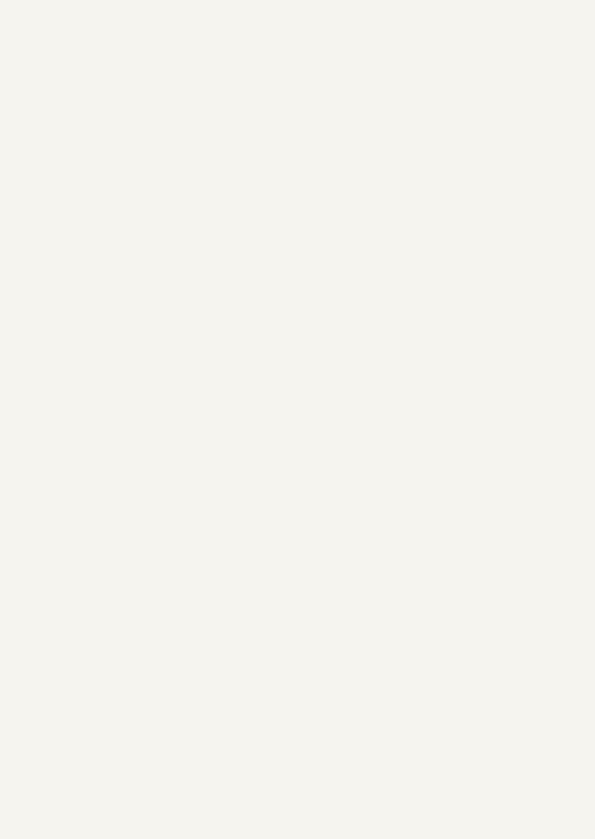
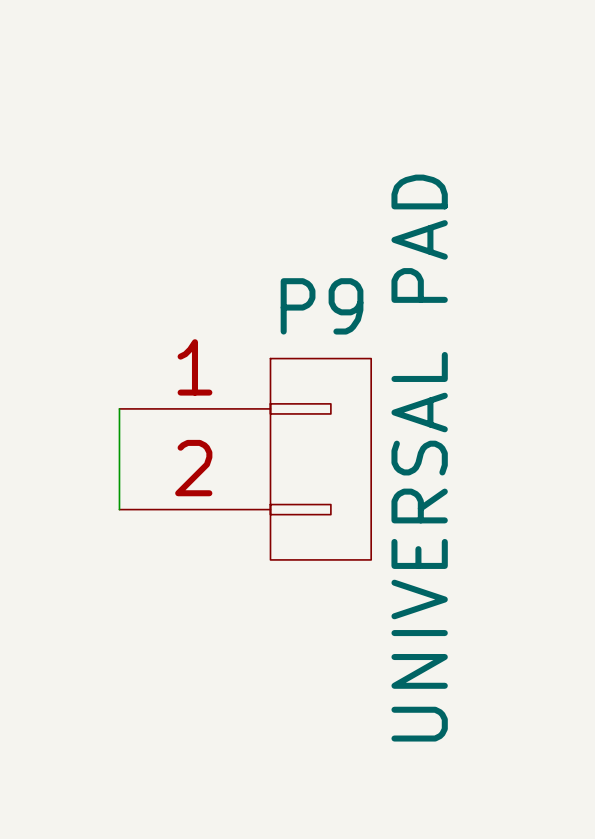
wire: none -> (119, 408) (119, 509)
P9: none -> UNIVERSAL PAD (245, 459)

